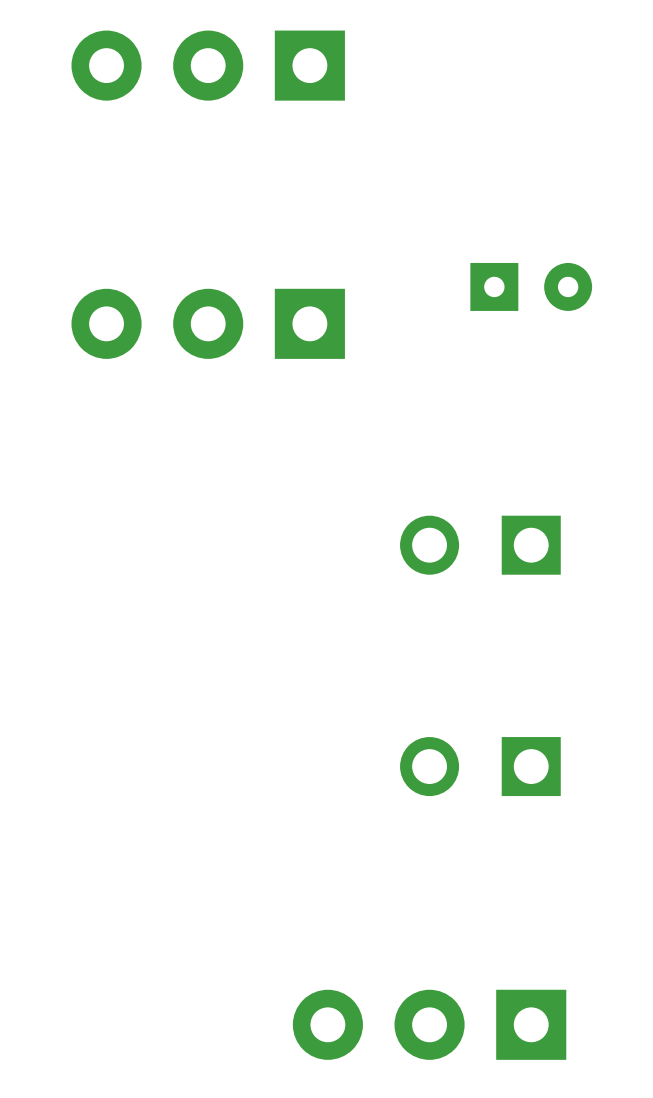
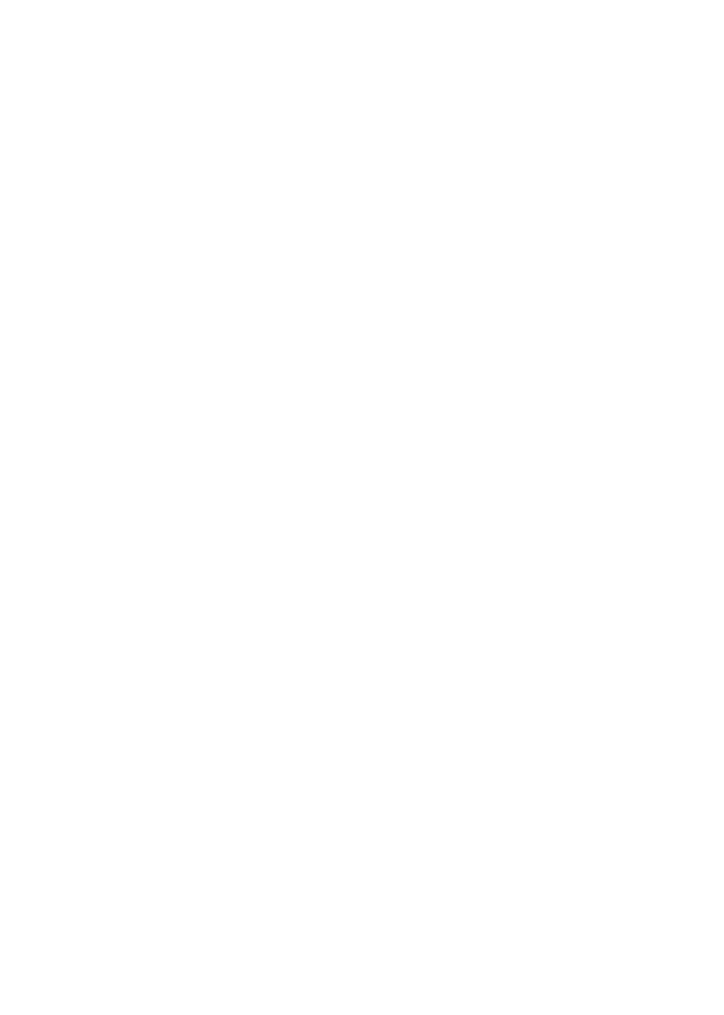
part: (208, 65) -> none
part: (531, 286) -> none
part: (208, 323) -> none
part: (480, 545) -> none
part: (480, 766) -> none
part: (429, 1024) -> none

